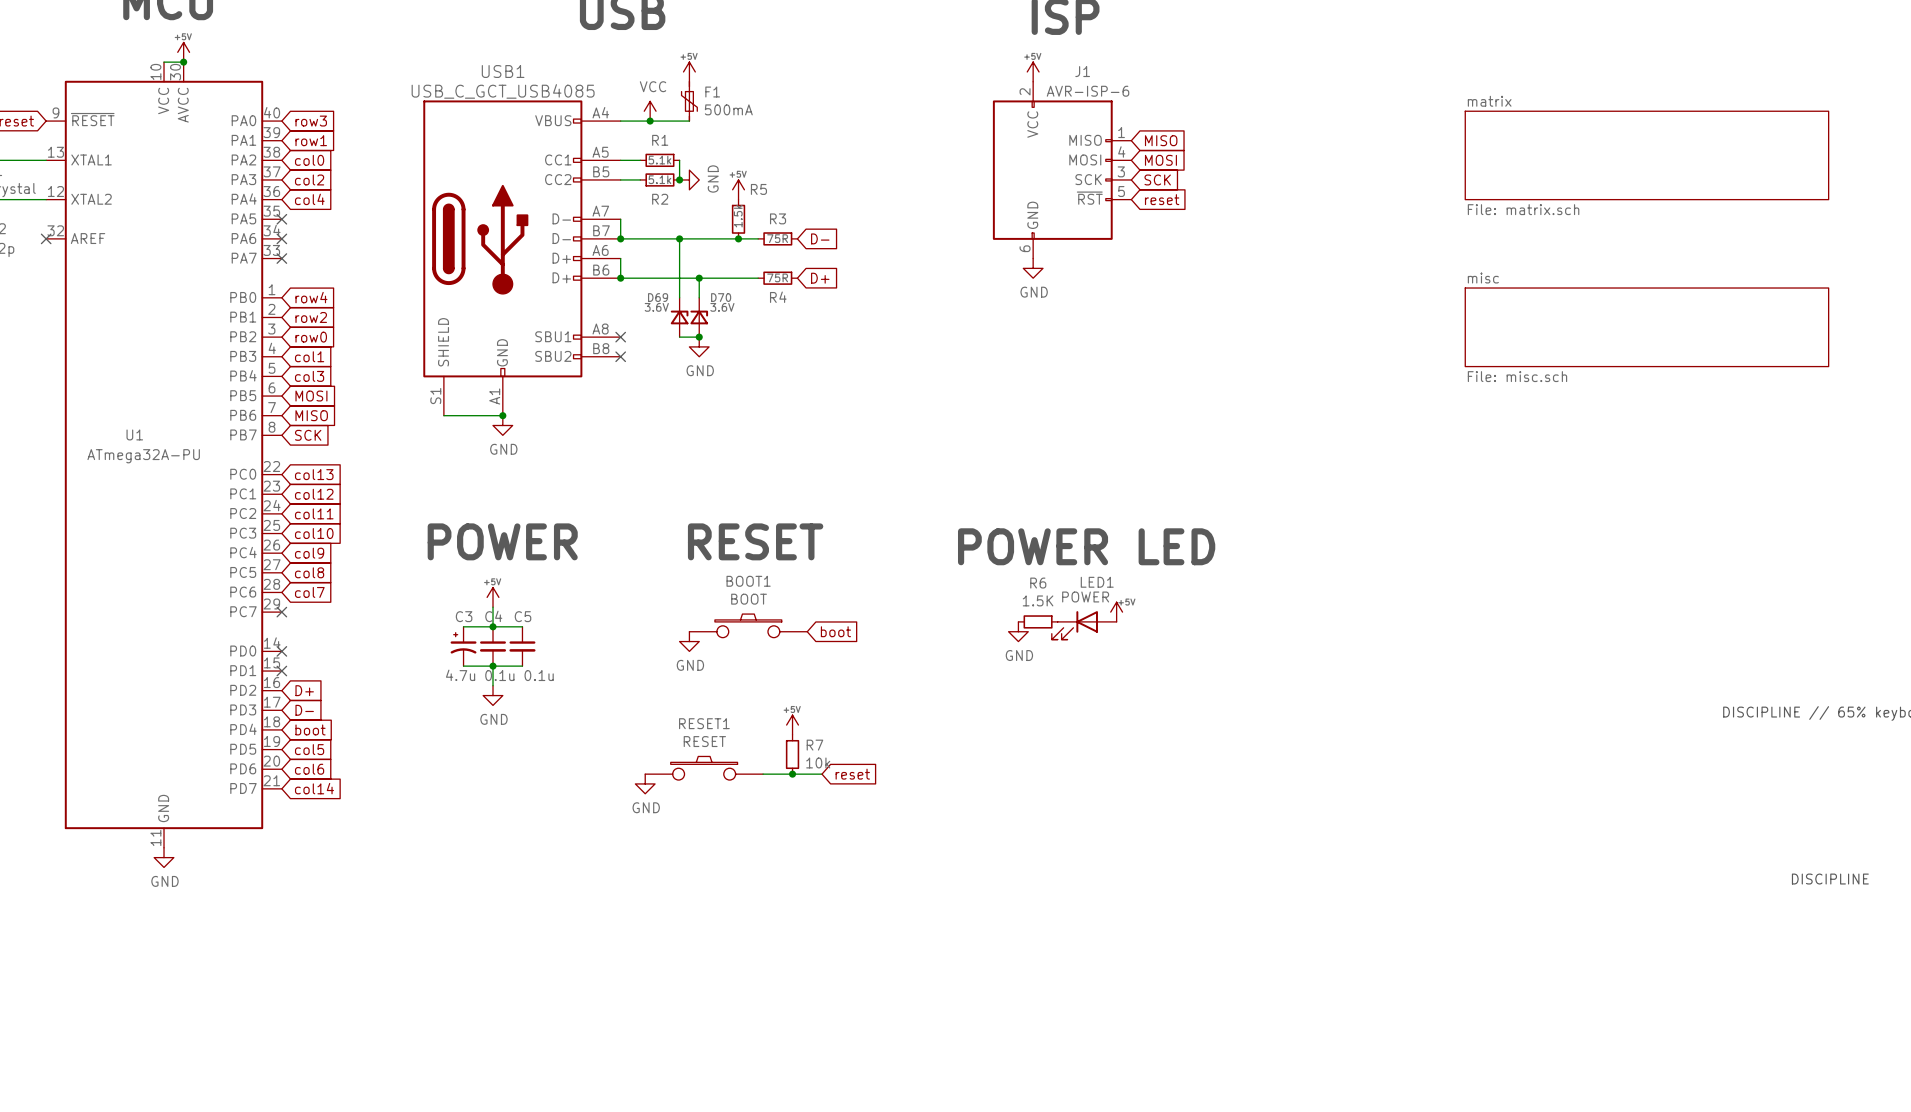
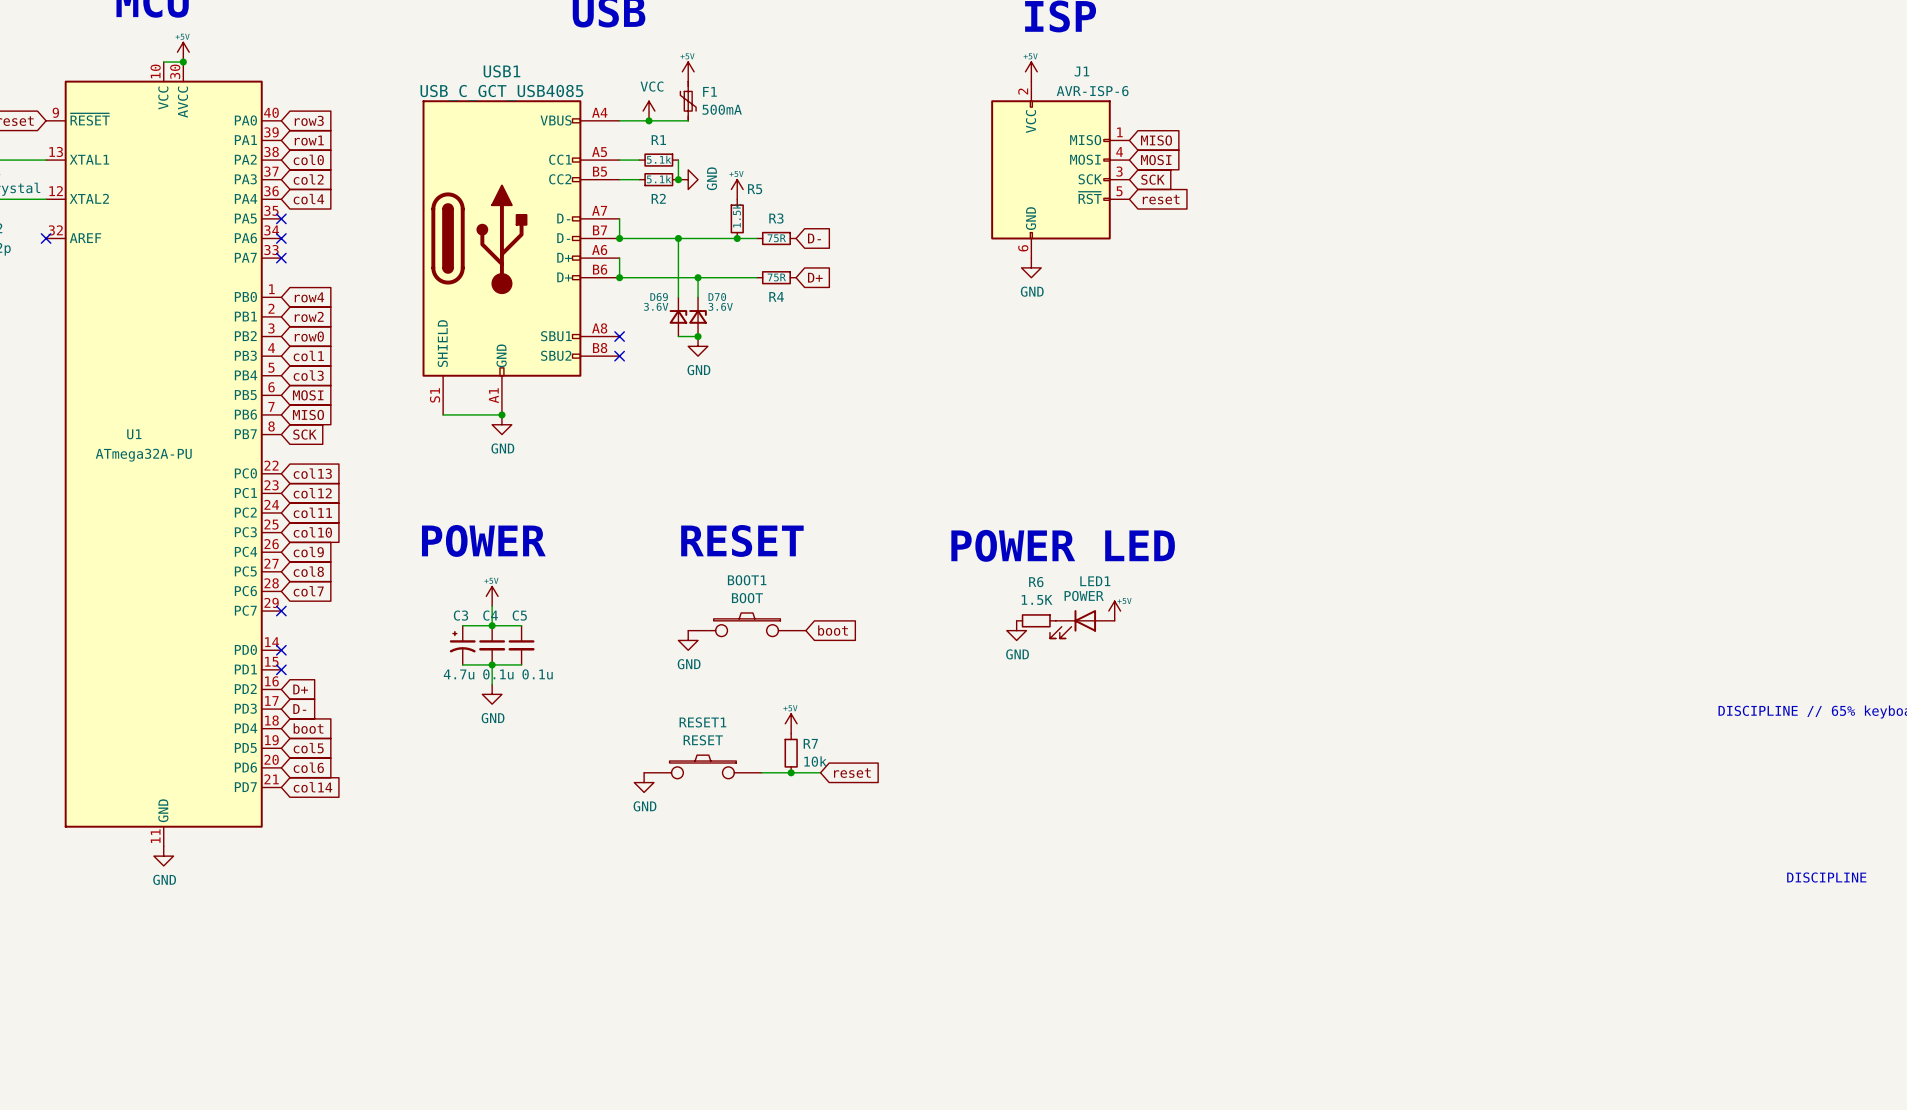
sheet matrix: File: matrix.sch (1646, 155) -> none
sheet misc: File: misc.sch (1646, 327) -> none

